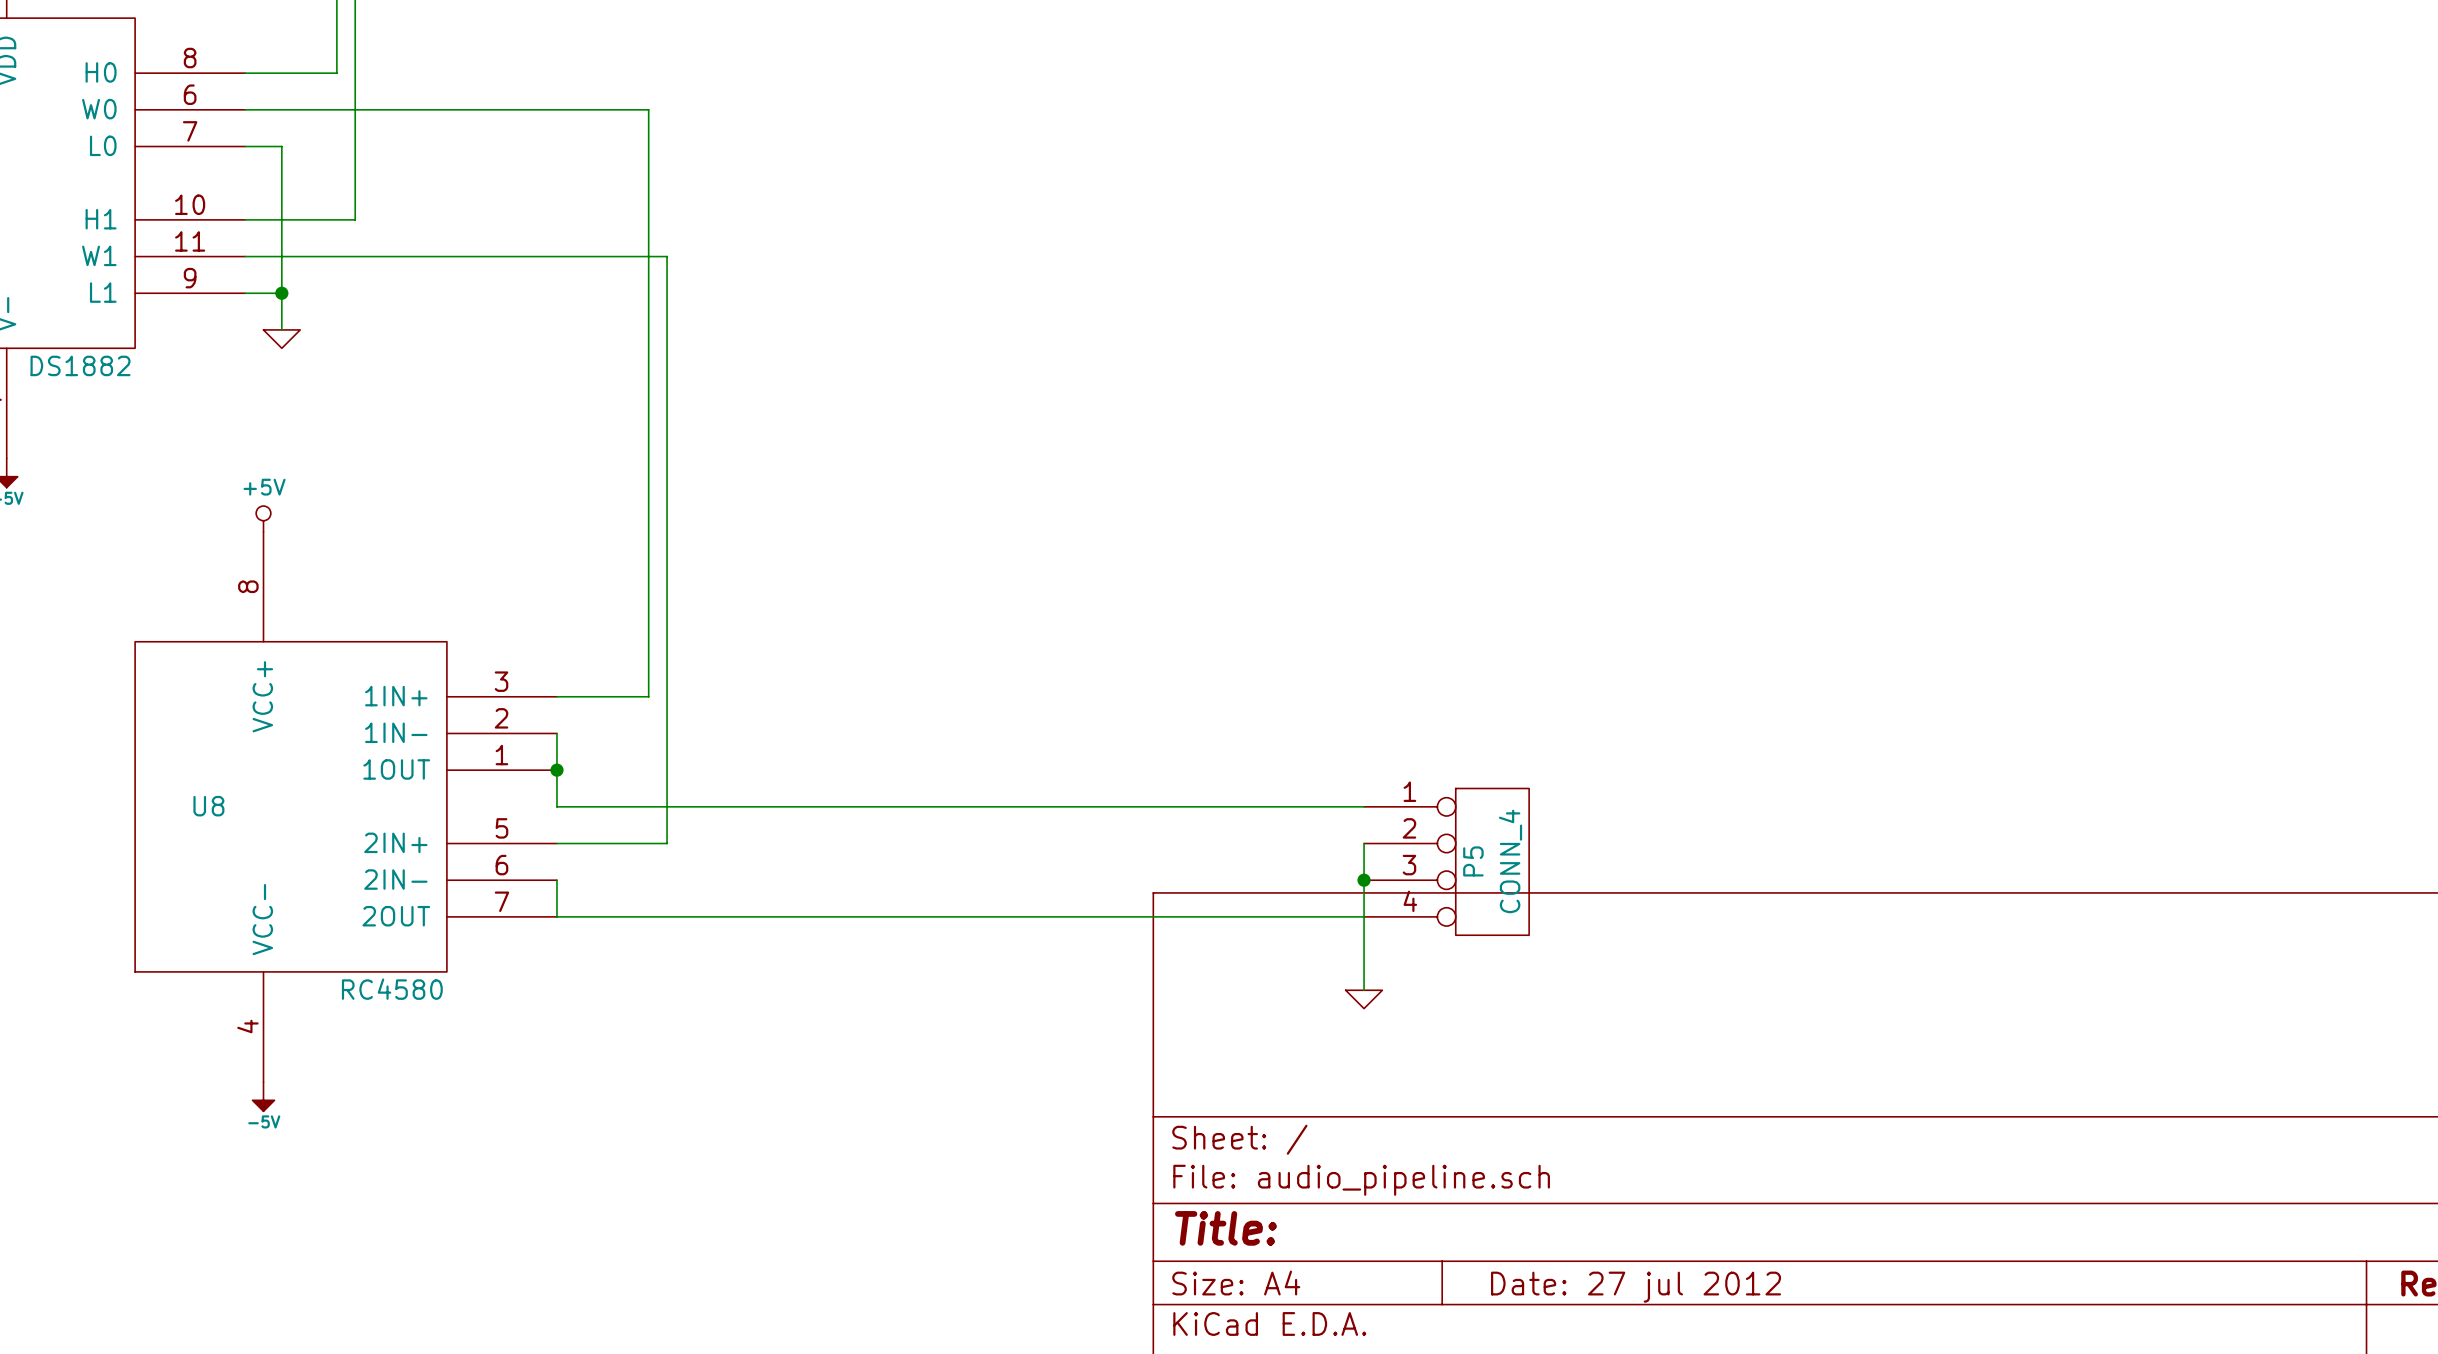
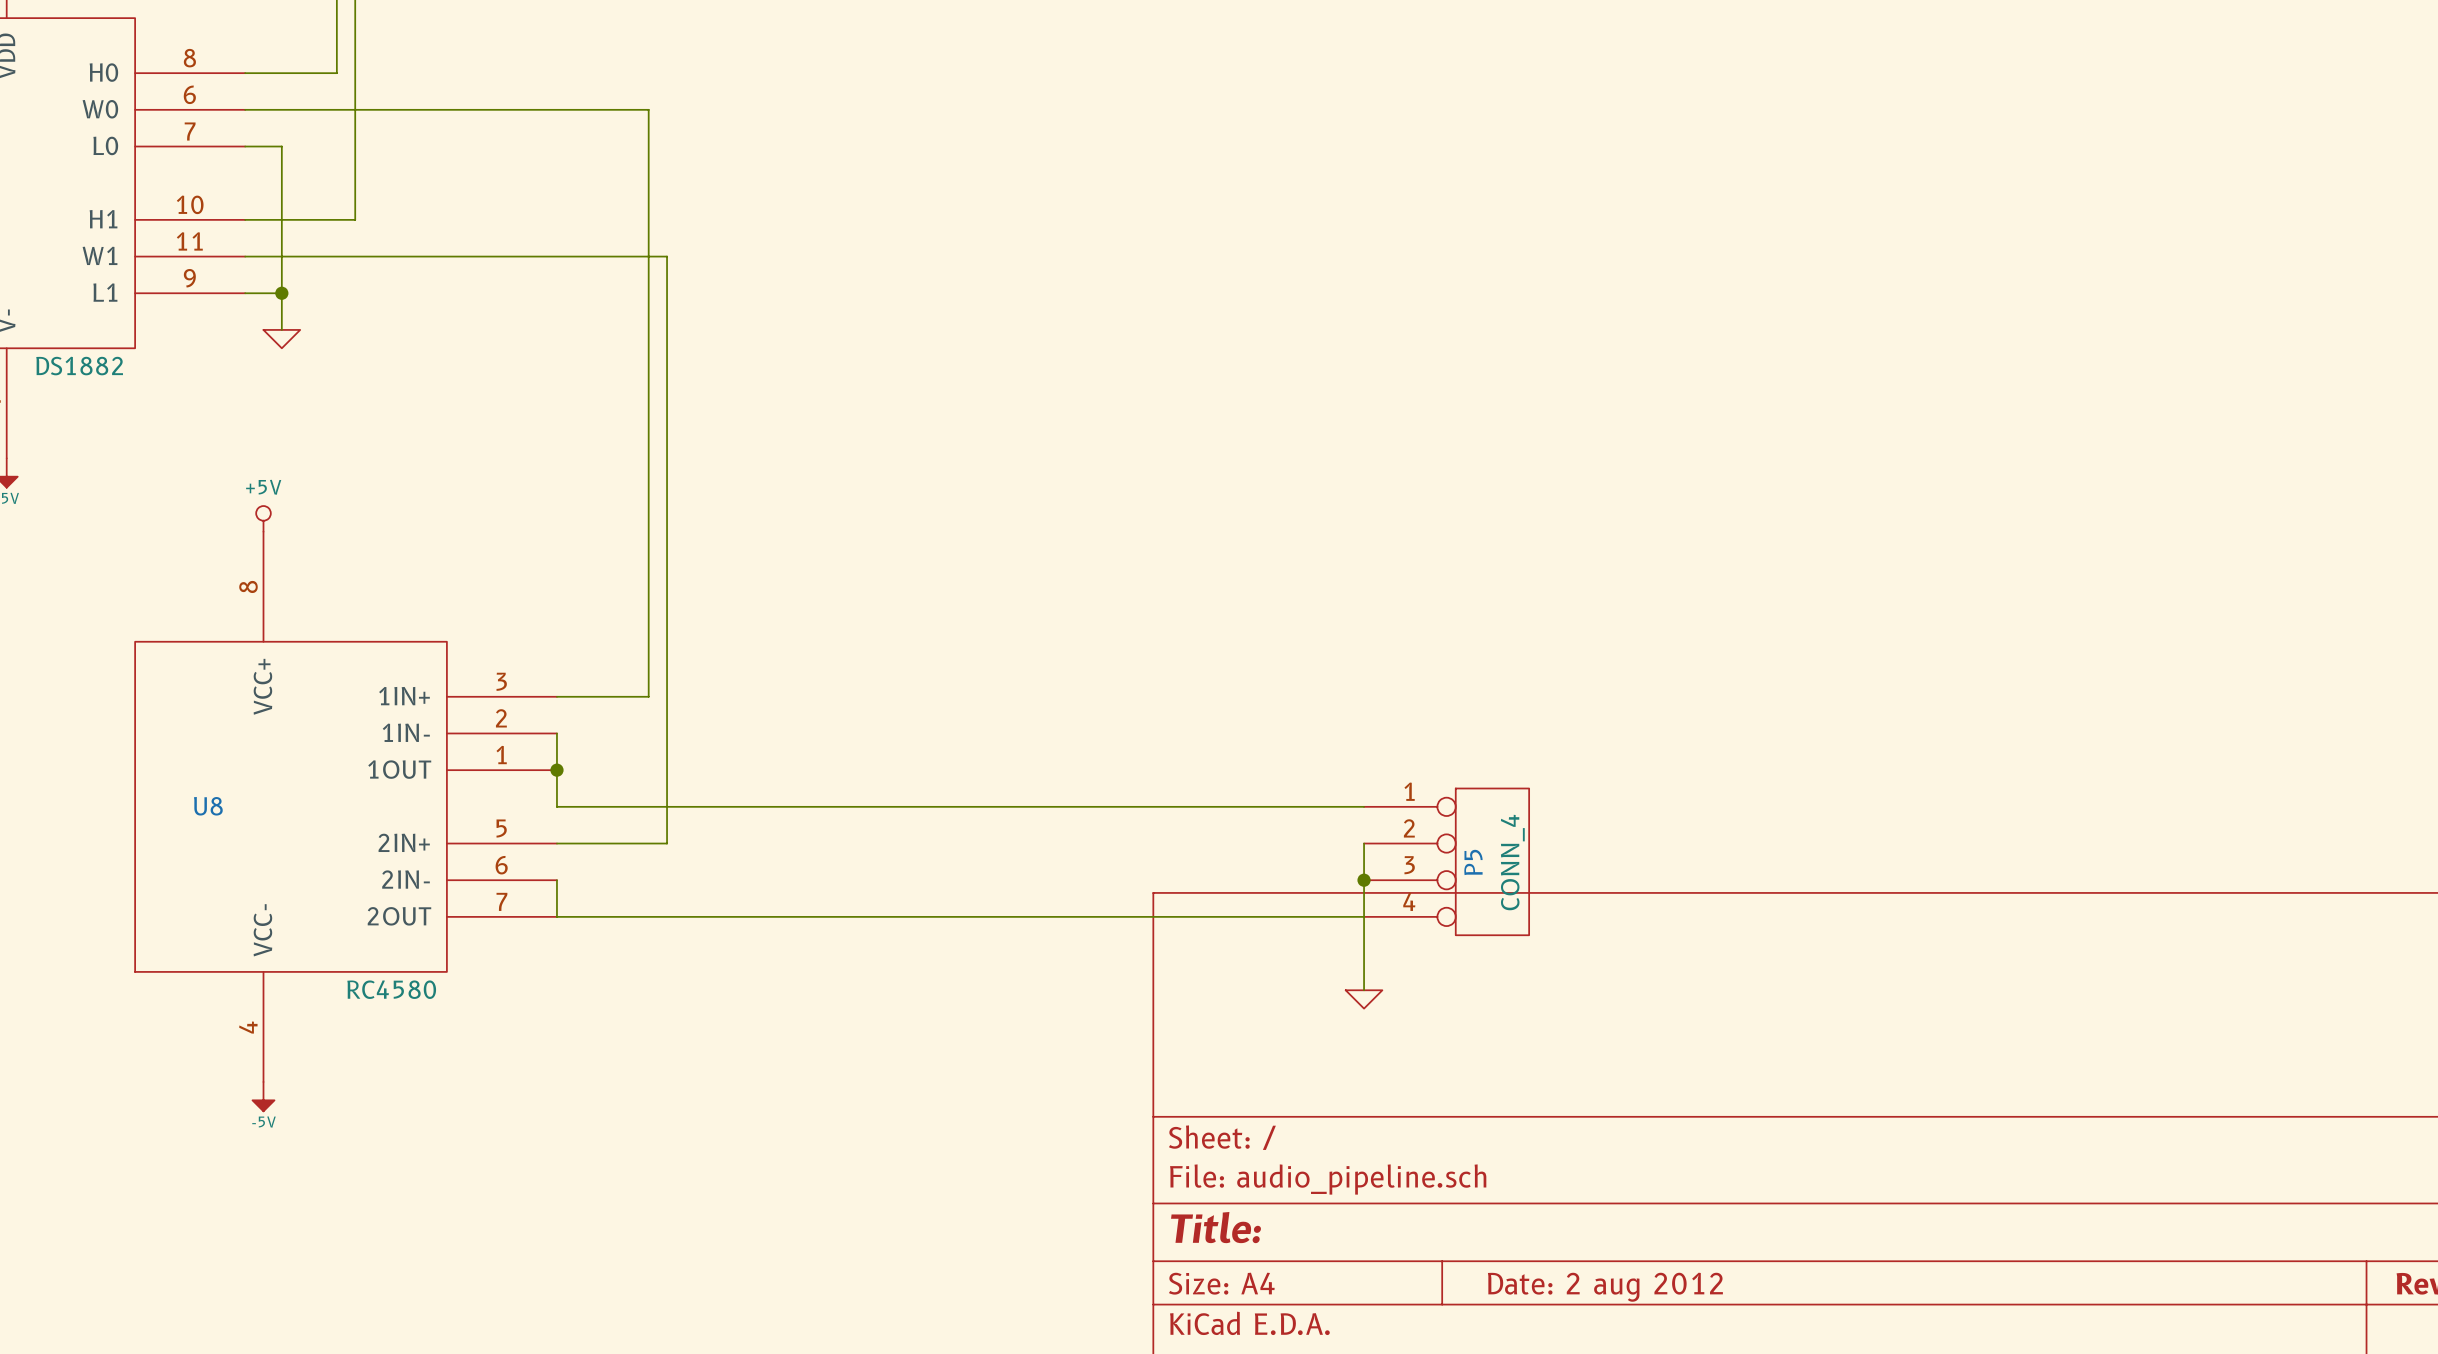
title block: Date: 27 jul 2012 (1636, 1287) -> Date: 2 aug 2012 (1605, 1287)

